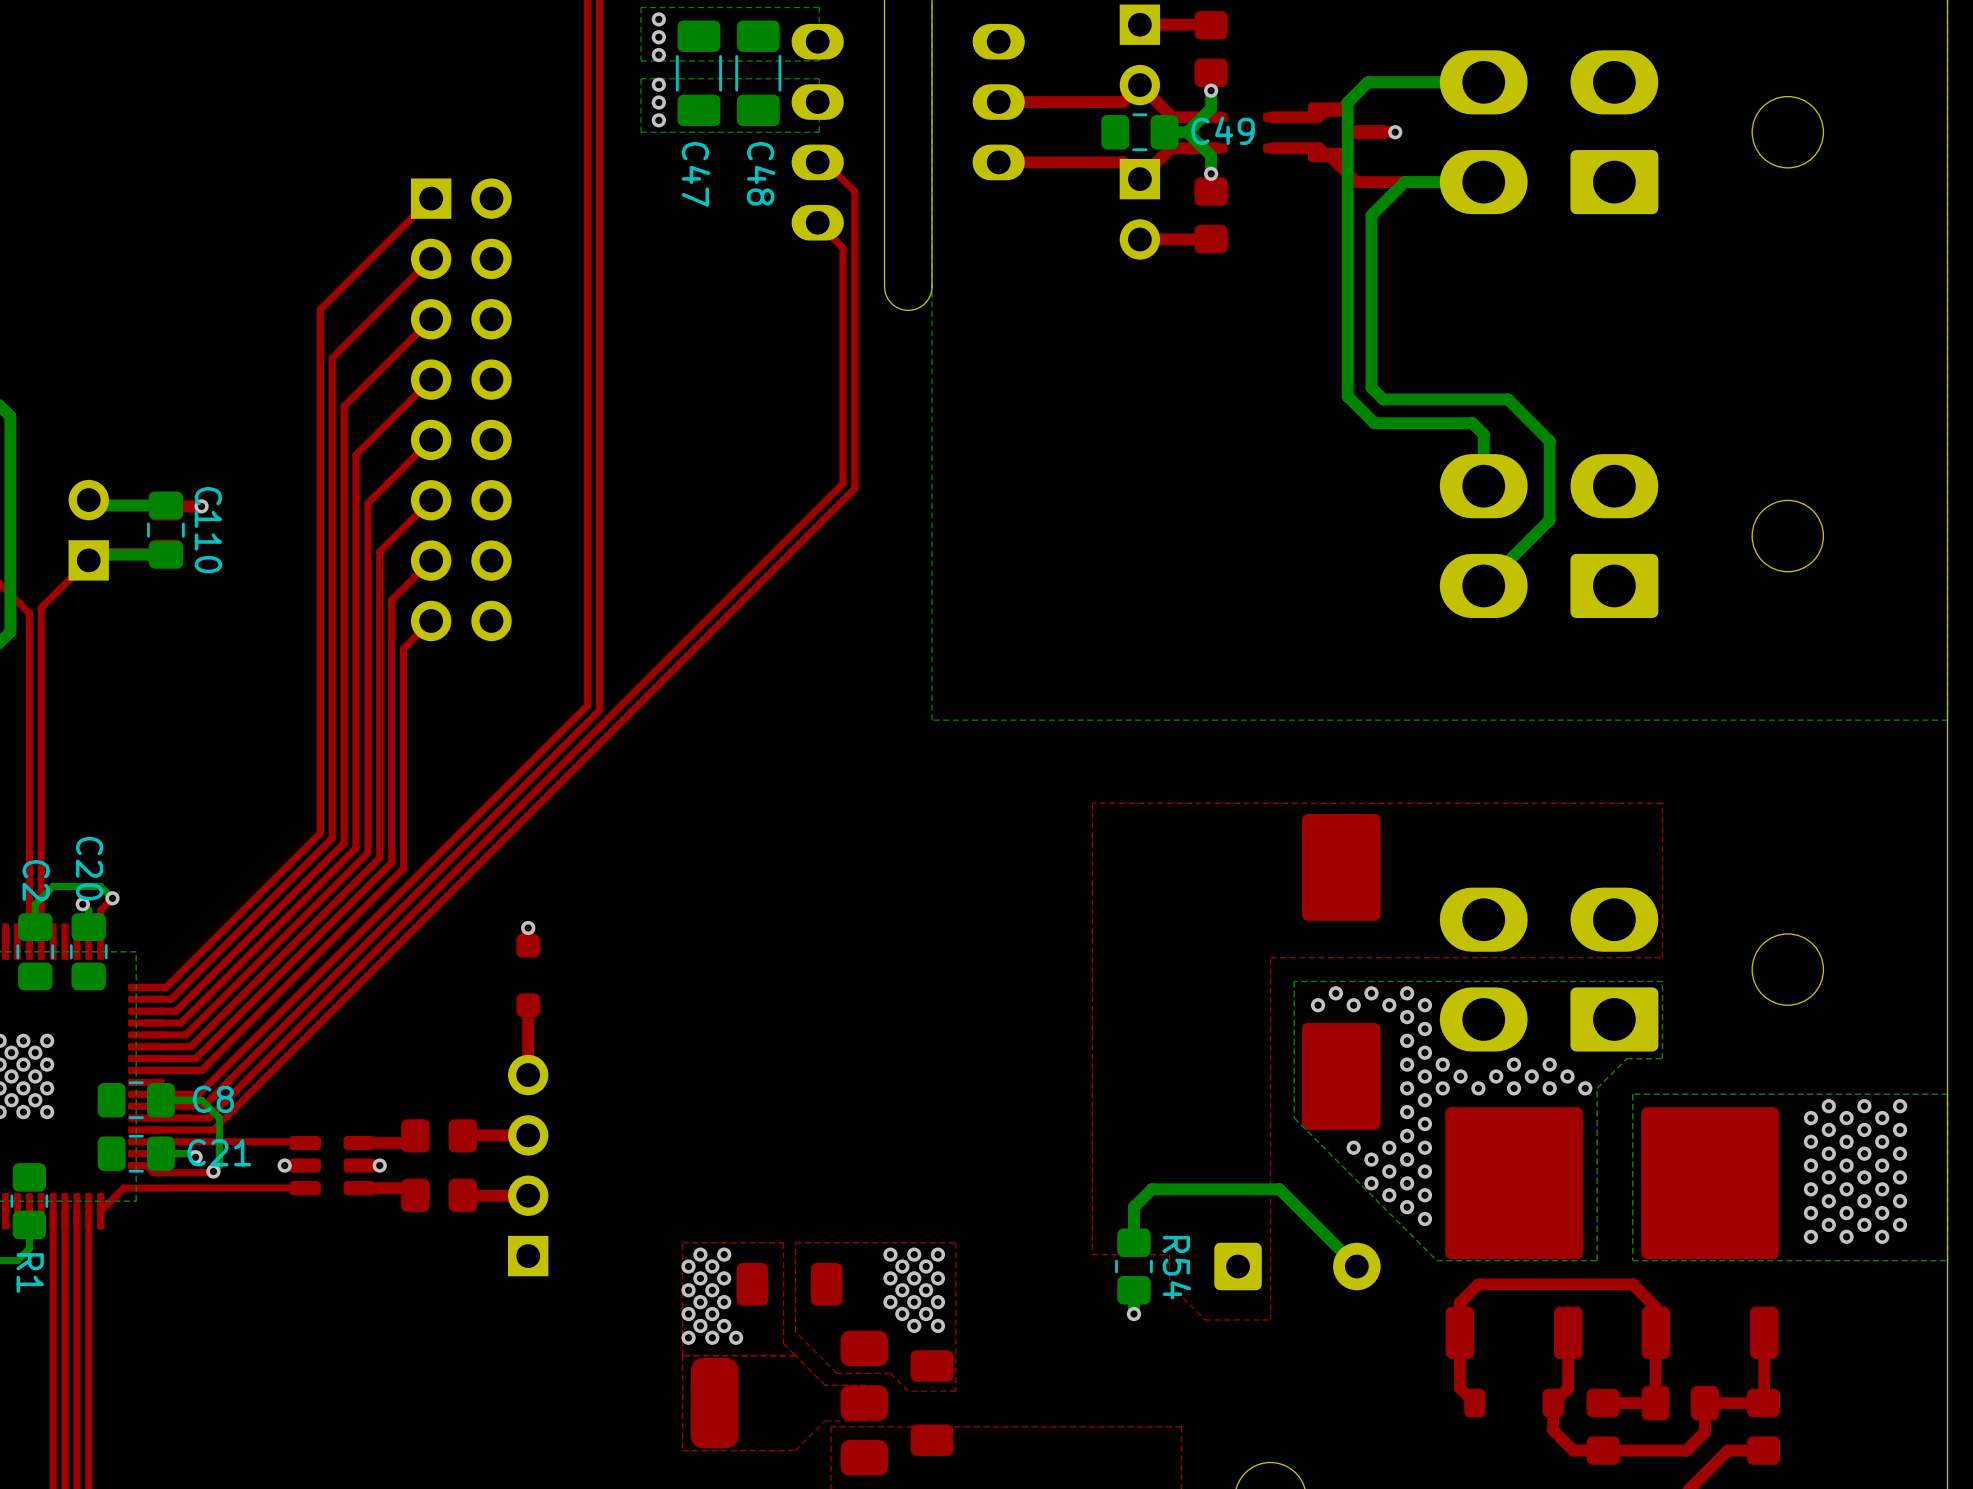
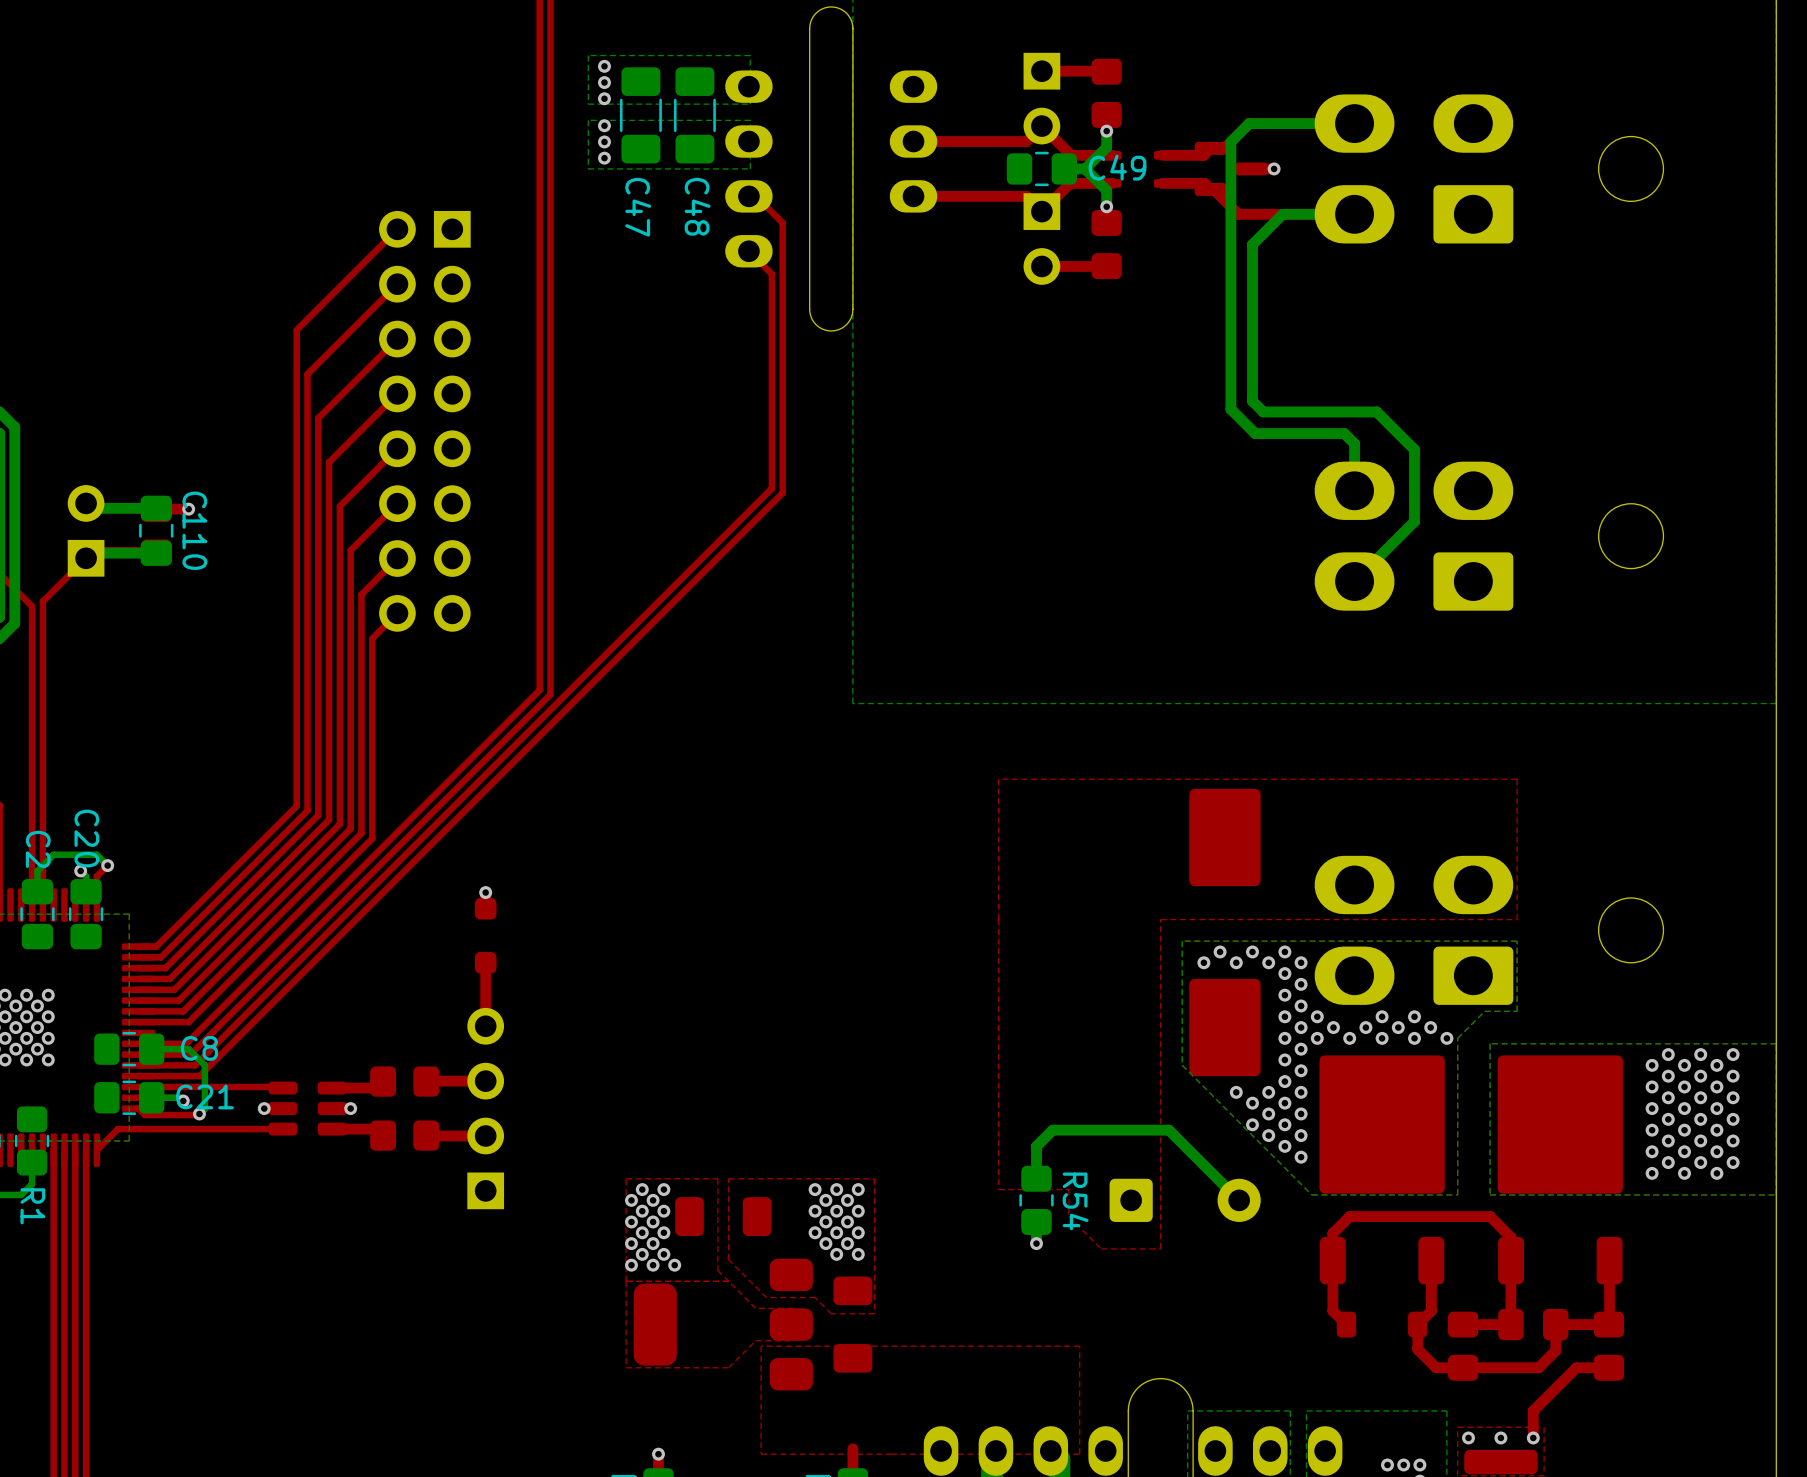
part footprint: [410, 178, 512, 642] -> [379, 210, 471, 632]

